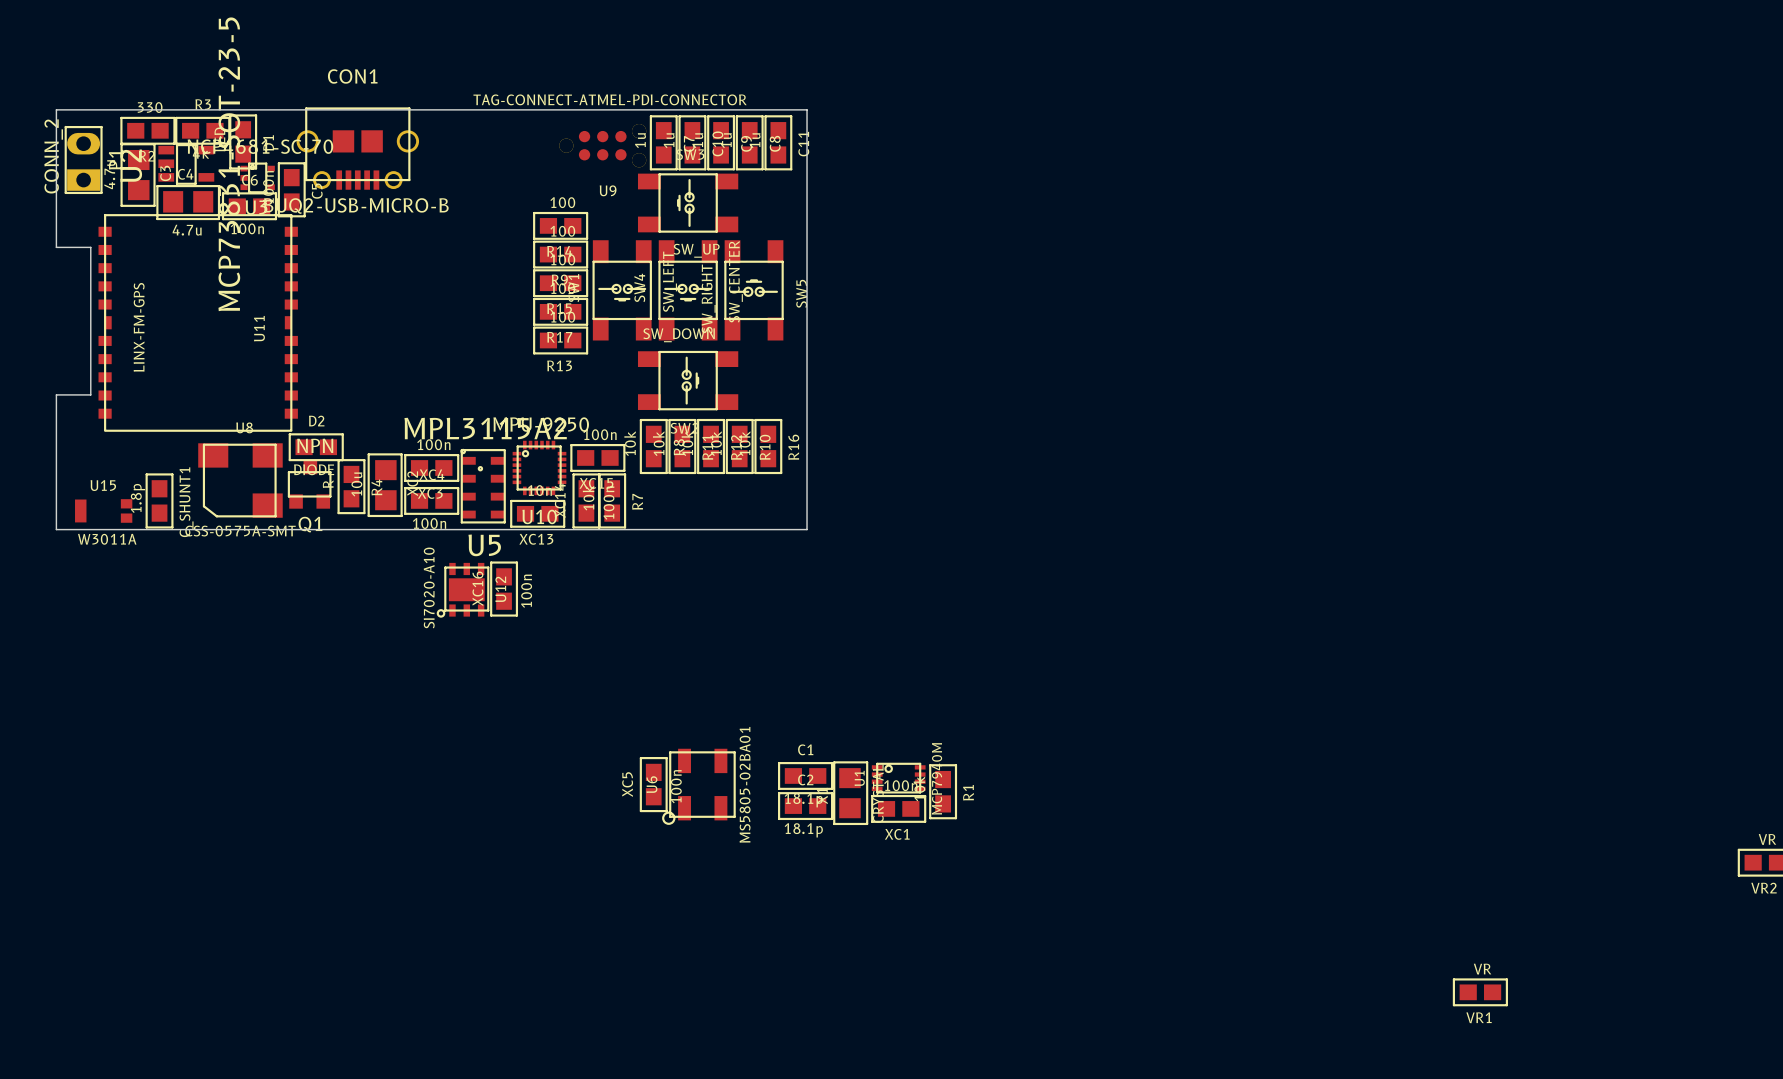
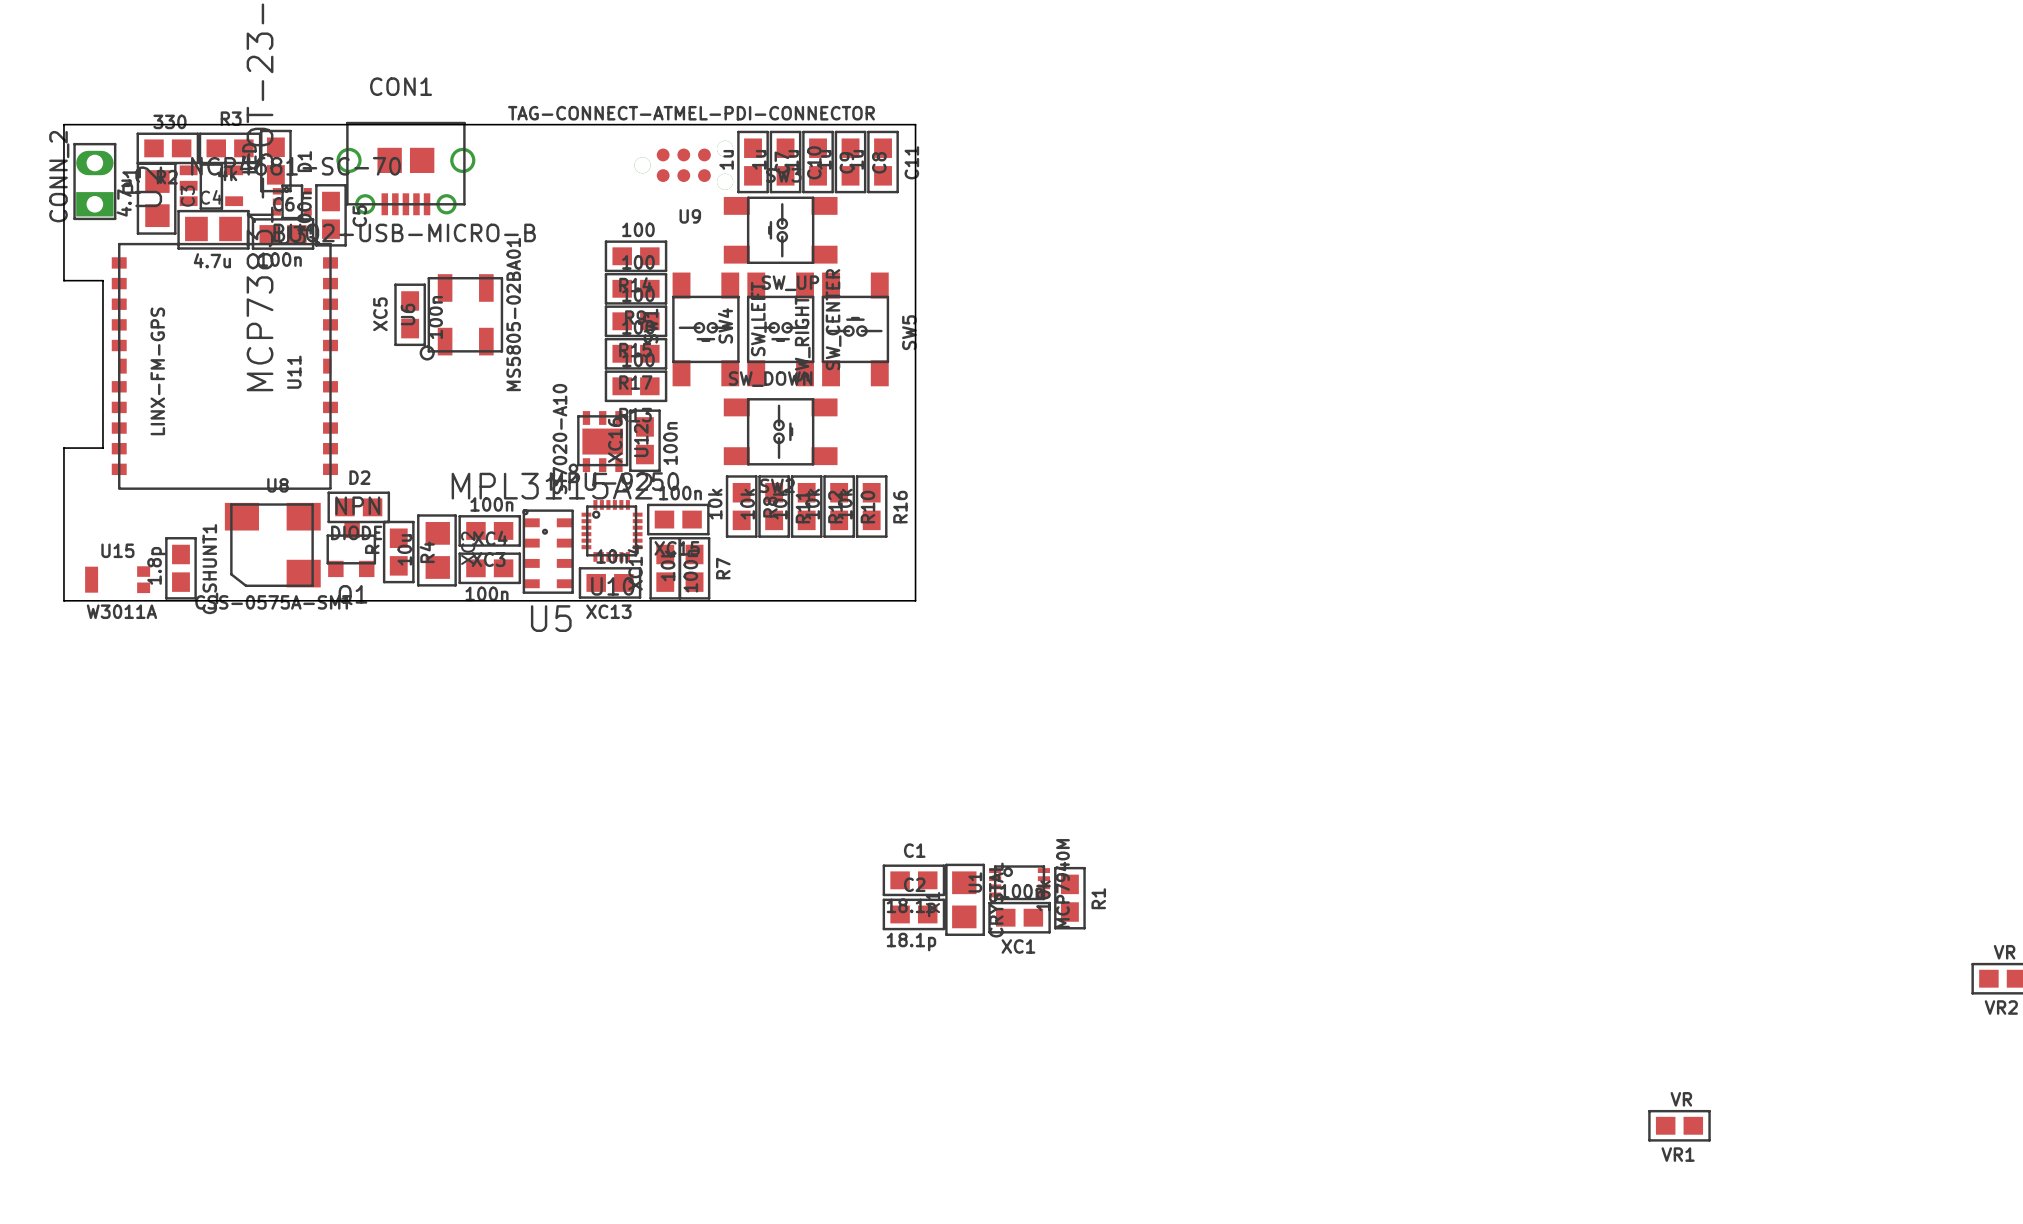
XC16 position: (504, 589) -> (644, 440)
U12 position: (463, 590) -> (598, 442)
XC5 position: (653, 784) -> (410, 314)
U6 position: (698, 786) -> (461, 317)

